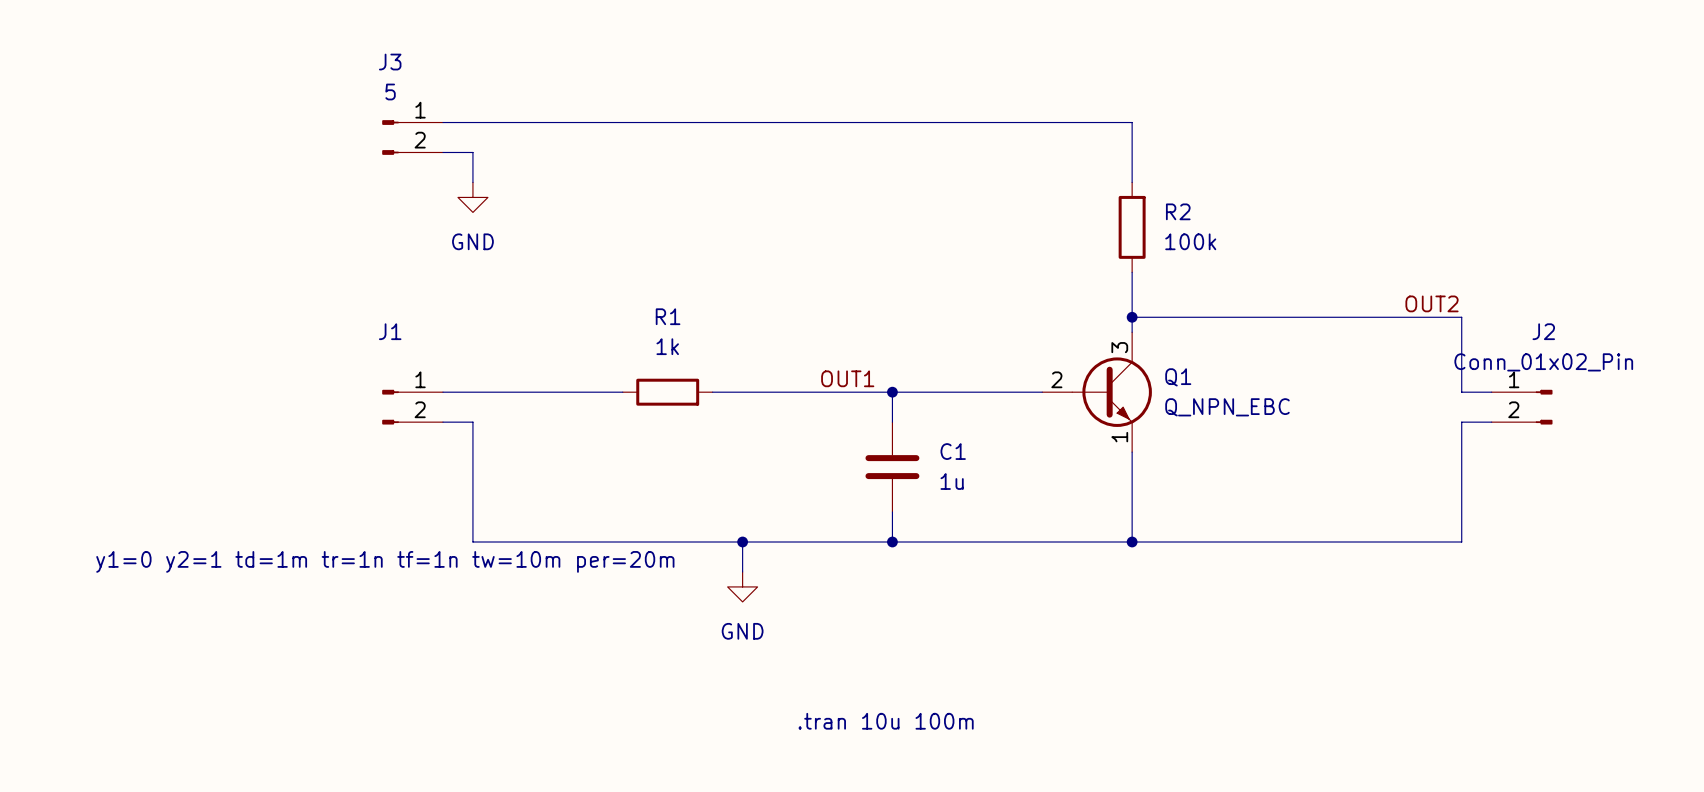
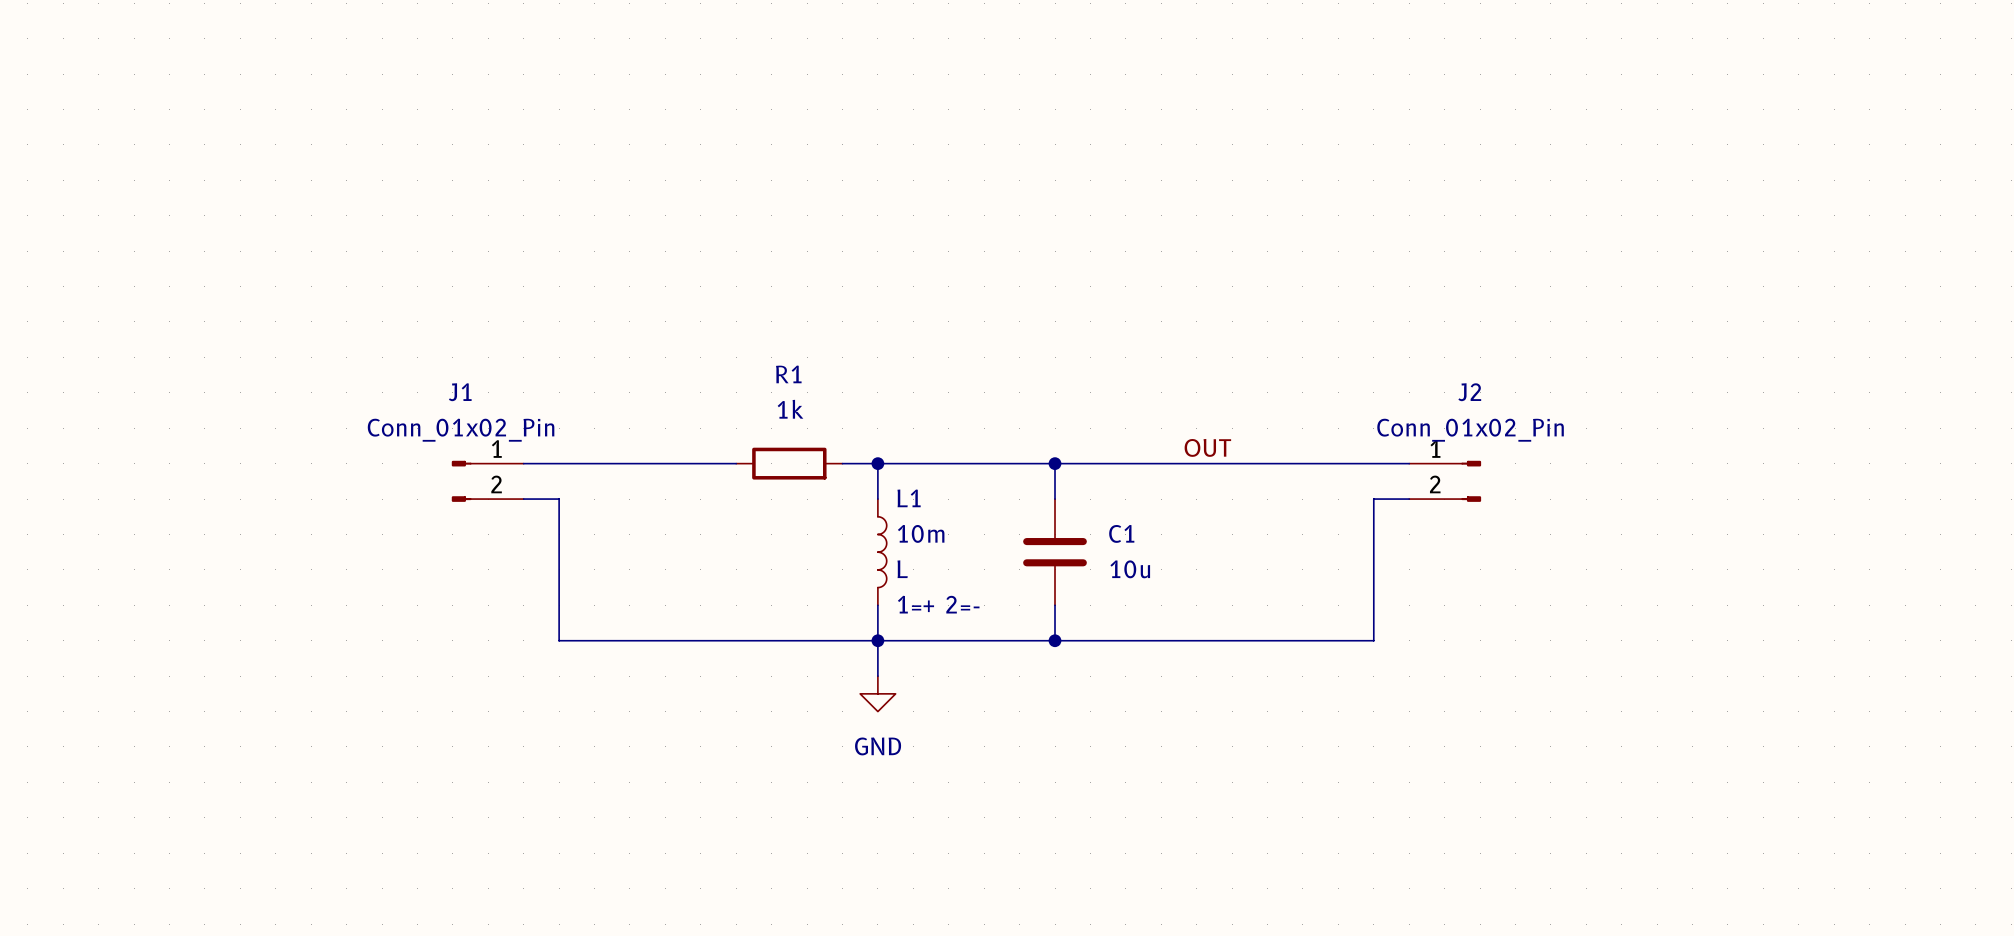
wire: (442, 122) (1132, 122) (1132, 182) -> none
J3: 5 (412, 137) -> none
wire: (442, 152) (472, 152) (472, 182) -> none
power symbol: GND (472, 197) -> none
R2: 100k (1132, 227) -> none
wire: (1132, 272) (1132, 332) -> none
label: OUT2 (1432, 303) -> none
wire: (1132, 317) (1461, 317) (1461, 392) (1491, 392) -> none
junction: (1132, 317) -> none
label: OUT1 (847, 378) -> none
label: none -> OUT (1207, 447)
wire: none -> (877, 463) (877, 499)
junction: none -> (877, 463)
wire: none -> (1232, 463) (1409, 463)
Q1: Q_NPN_EBC (1097, 392) -> none
J2 position: (1522, 407) -> (1445, 481)
wire: (1491, 422) (1461, 422) (1461, 542) (1162, 542) -> (1409, 499) (1373, 499) (1373, 640)
wire: (1132, 452) (1132, 542) -> none
L1: none -> 10m (882, 552)
C1 value: 1u (952, 481) -> 10u (1130, 569)
wire: none -> (877, 605) (877, 640)
junction: (1132, 542) -> none
J1 value: y1=0 y2=1 td=1m tr=1n tf=1n tw=10m per=20m (385, 561) -> Conn_01x02_Pin (461, 430)
text: .tran 10u 100m (886, 721) -> none

